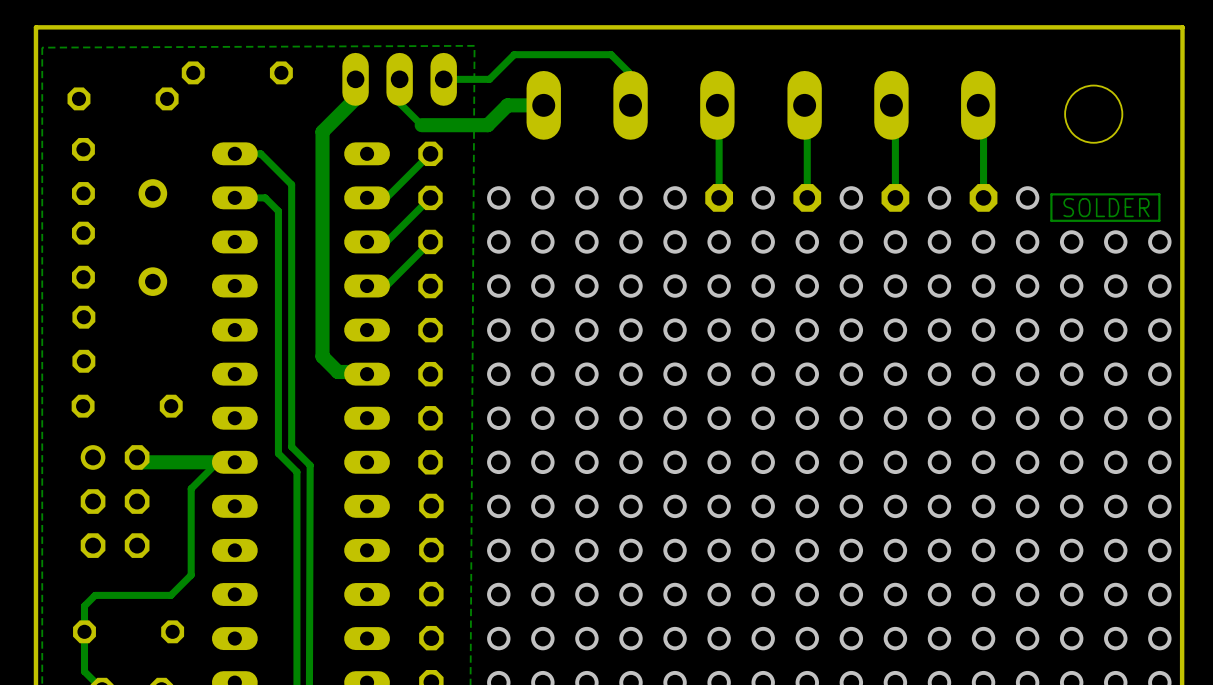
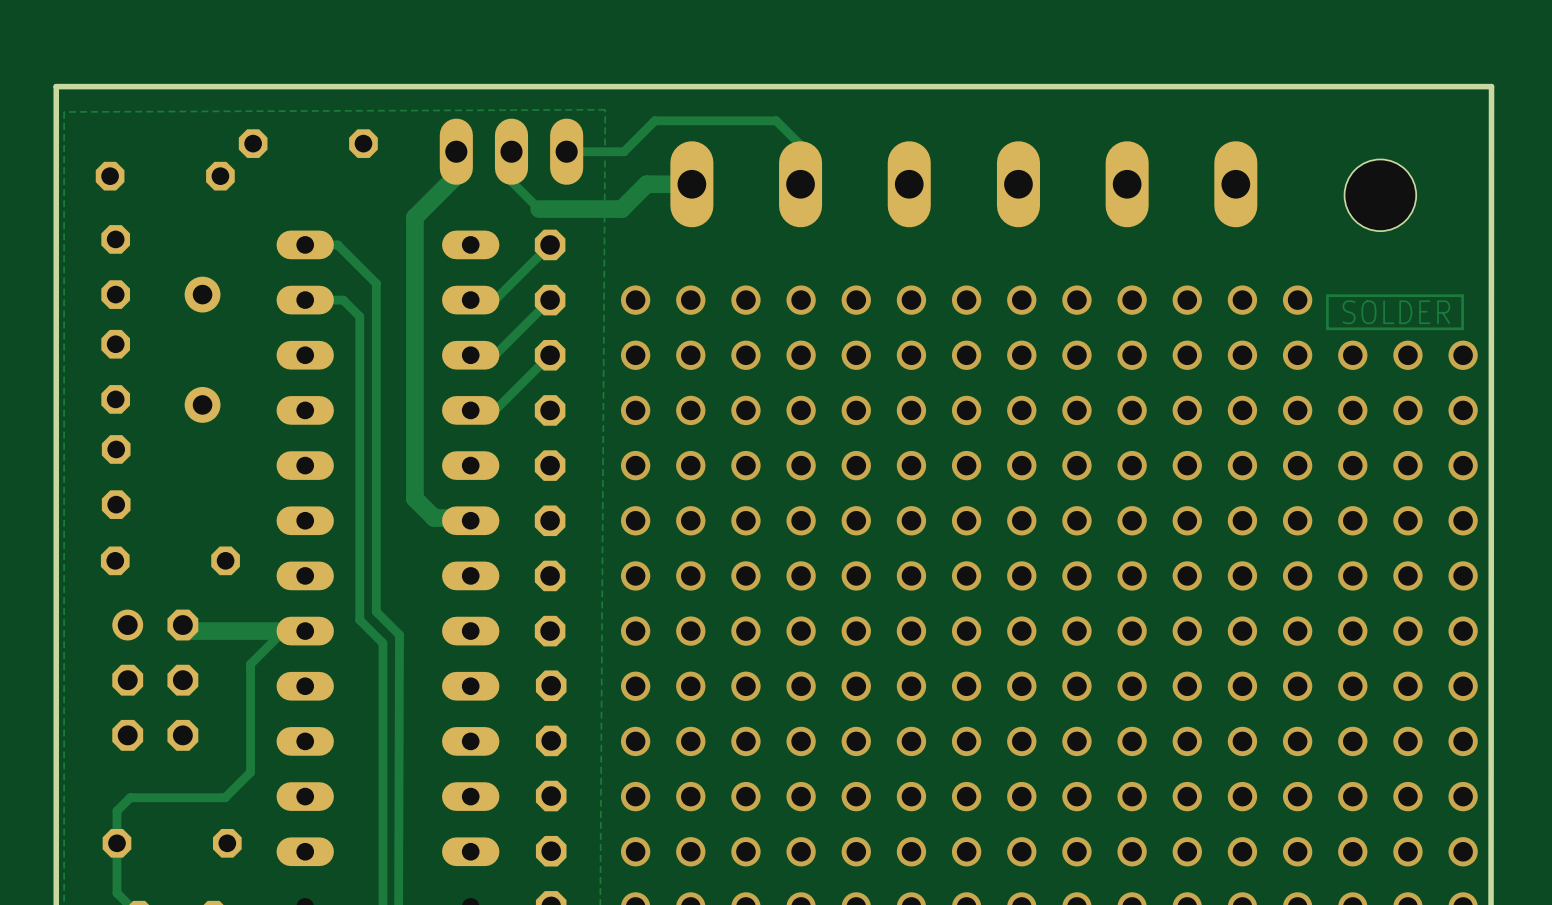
track: (717, 105) (719, 107) (719, 197) -> none
track: (804, 105) (807, 108) (807, 197) -> none
track: (891, 105) (895, 109) (895, 197) -> none
track: (978, 105) (983, 110) (983, 197) -> none
part: (719, 197) -> none
via: none -> (911, 300)
part: (807, 197) -> none
via: none -> (1021, 300)
part: (895, 197) -> none
via: none -> (1132, 300)
part: (983, 197) -> none
via: none -> (1242, 300)

